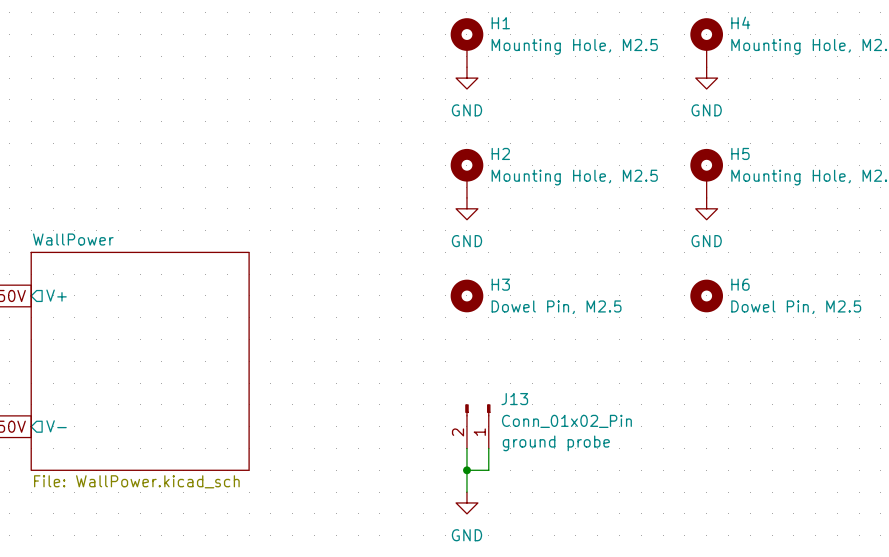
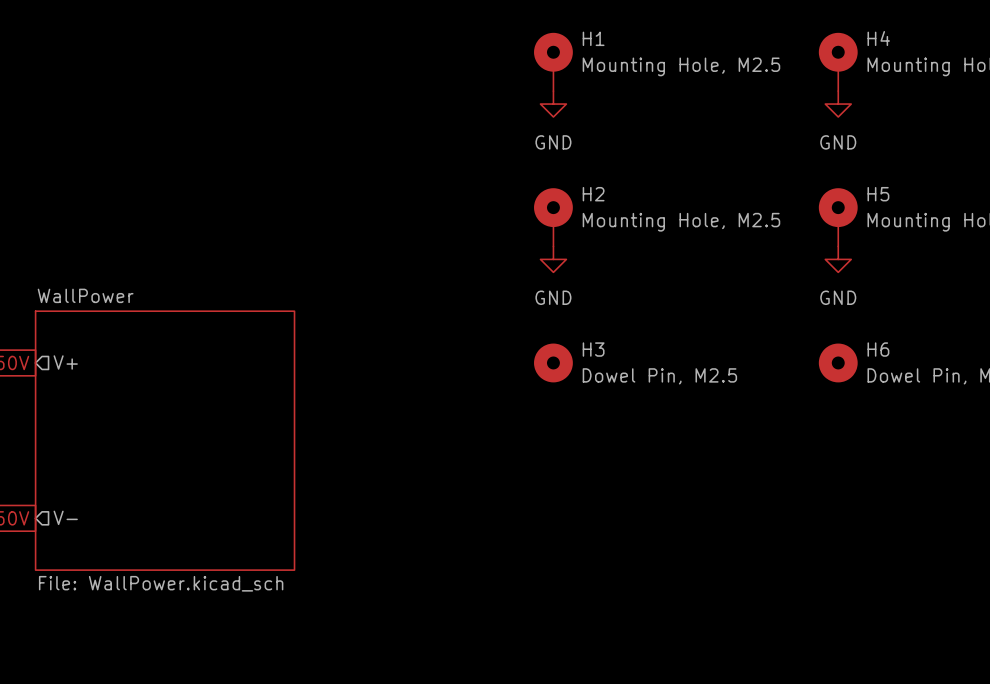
J13: Conn_01x02_Pin (477, 426) -> none
wire: (466, 448) (466, 492) -> none
wire: (488, 448) (488, 470) (466, 470) -> none
junction: (466, 470) -> none
power symbol: GND (466, 502) -> none

